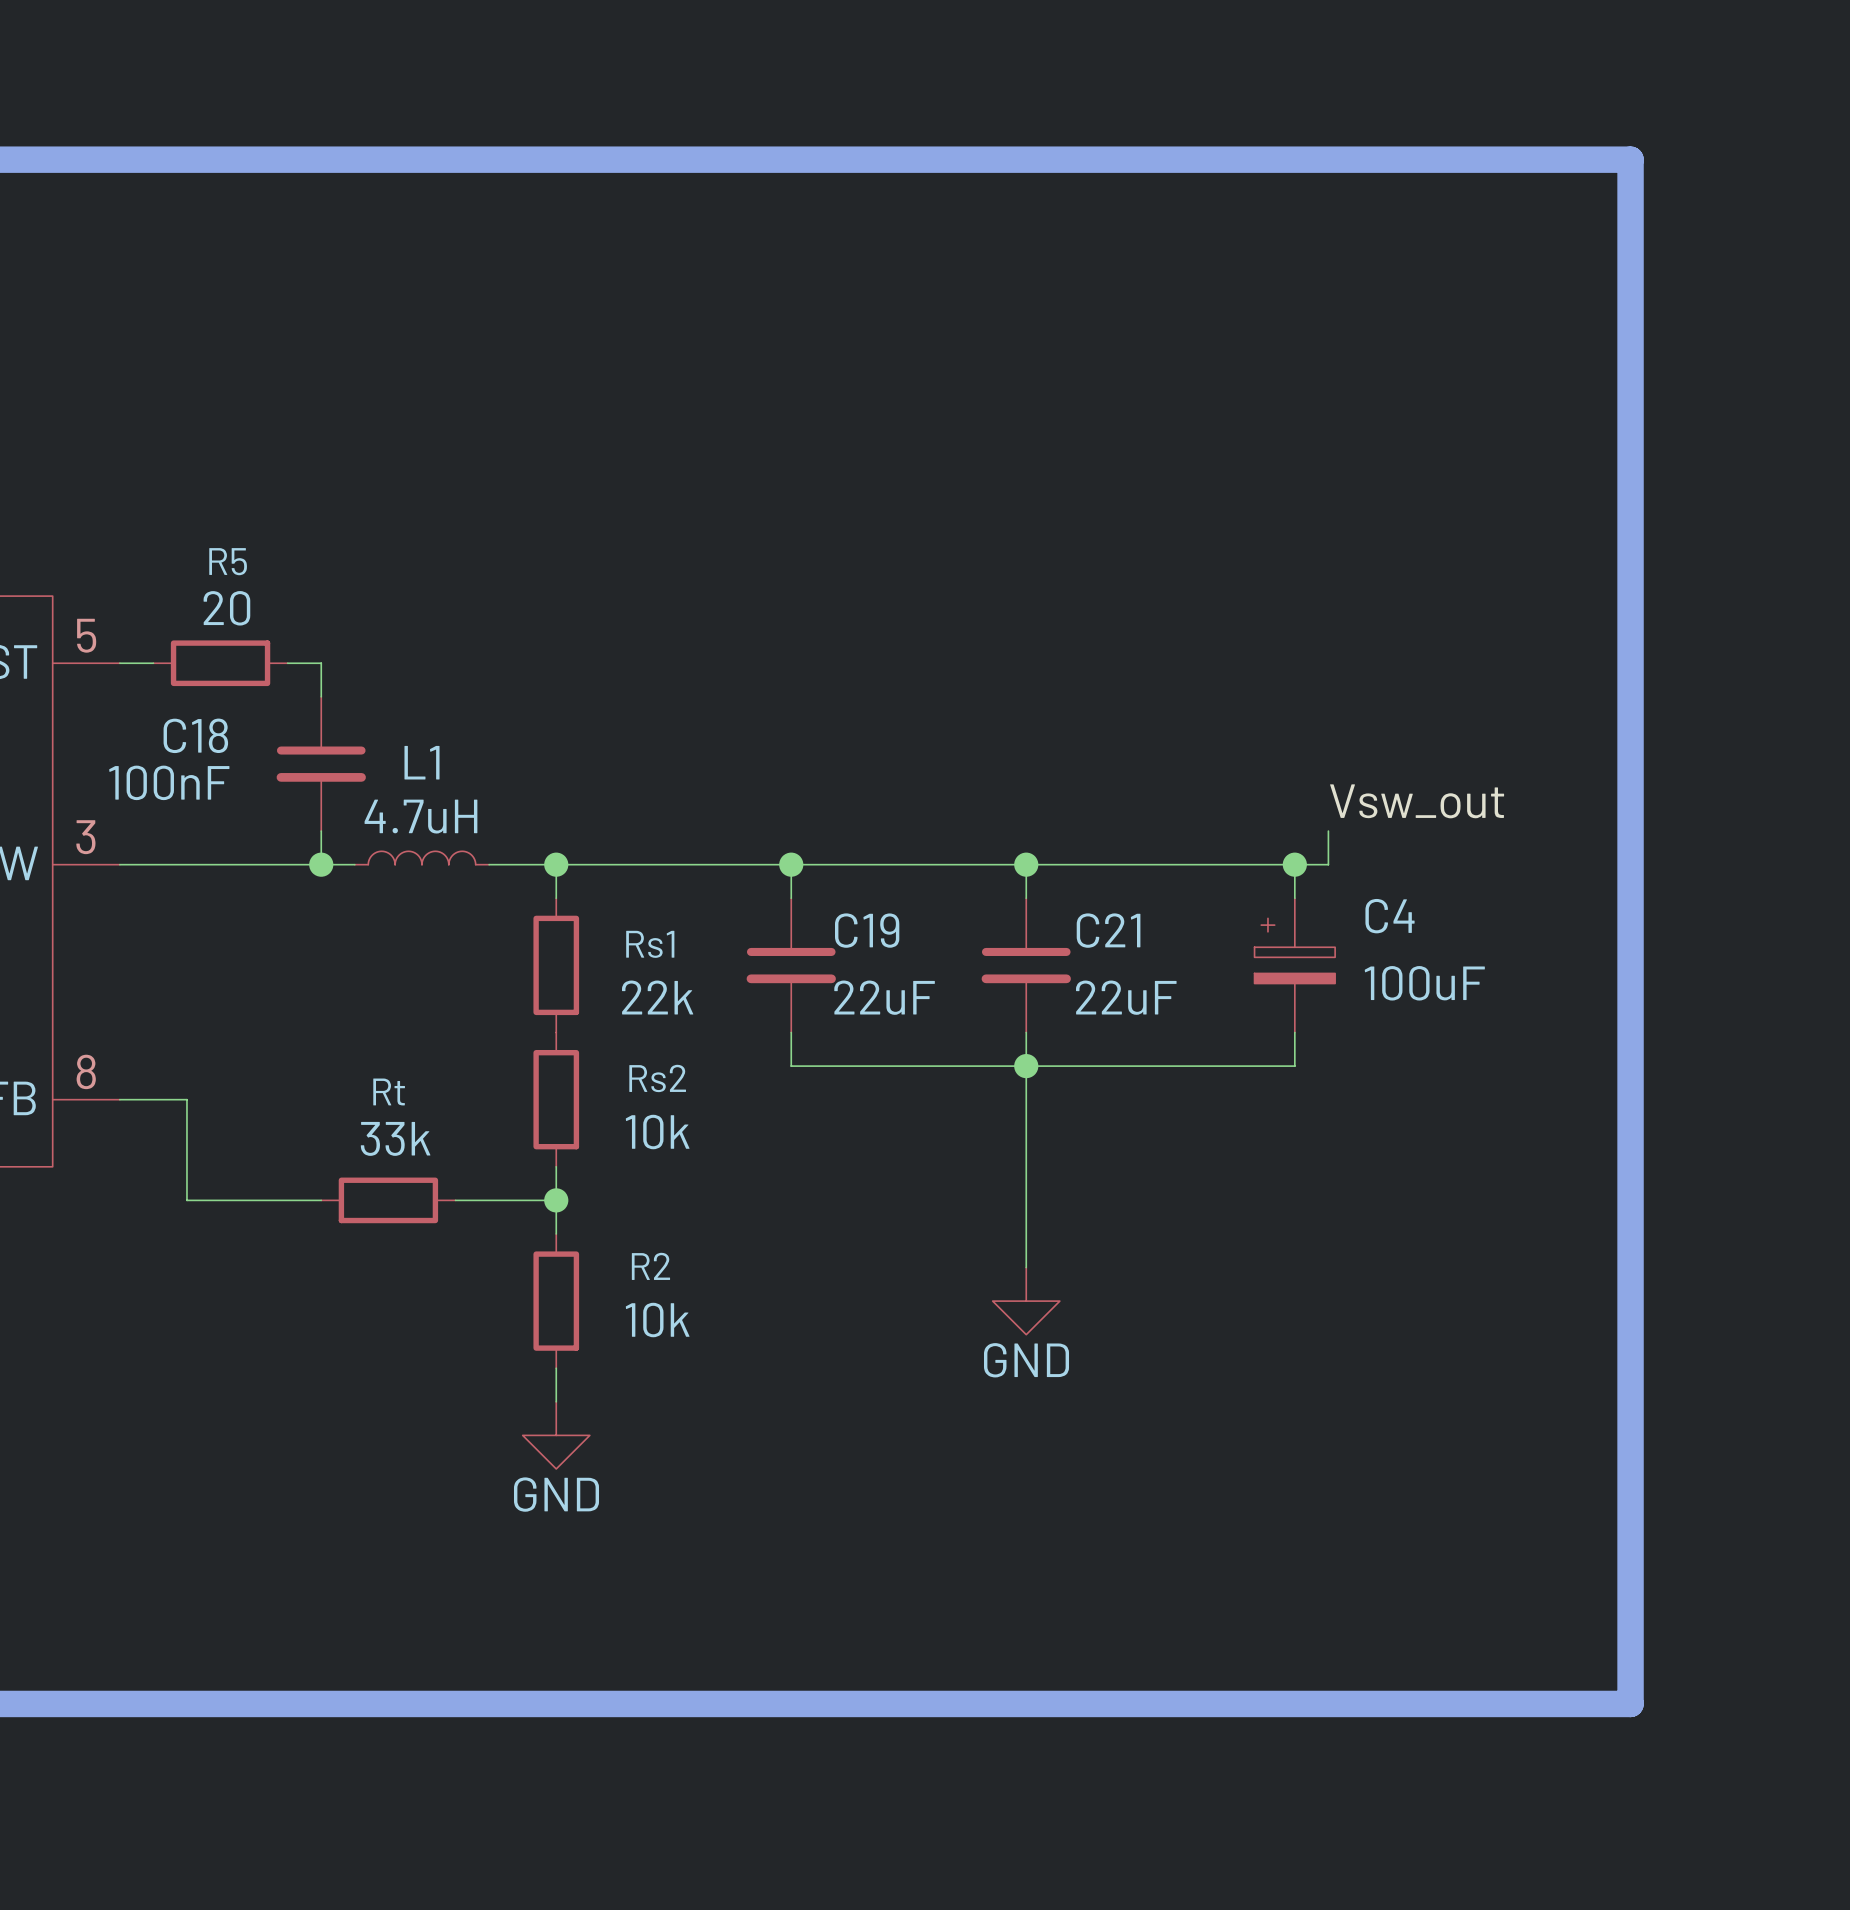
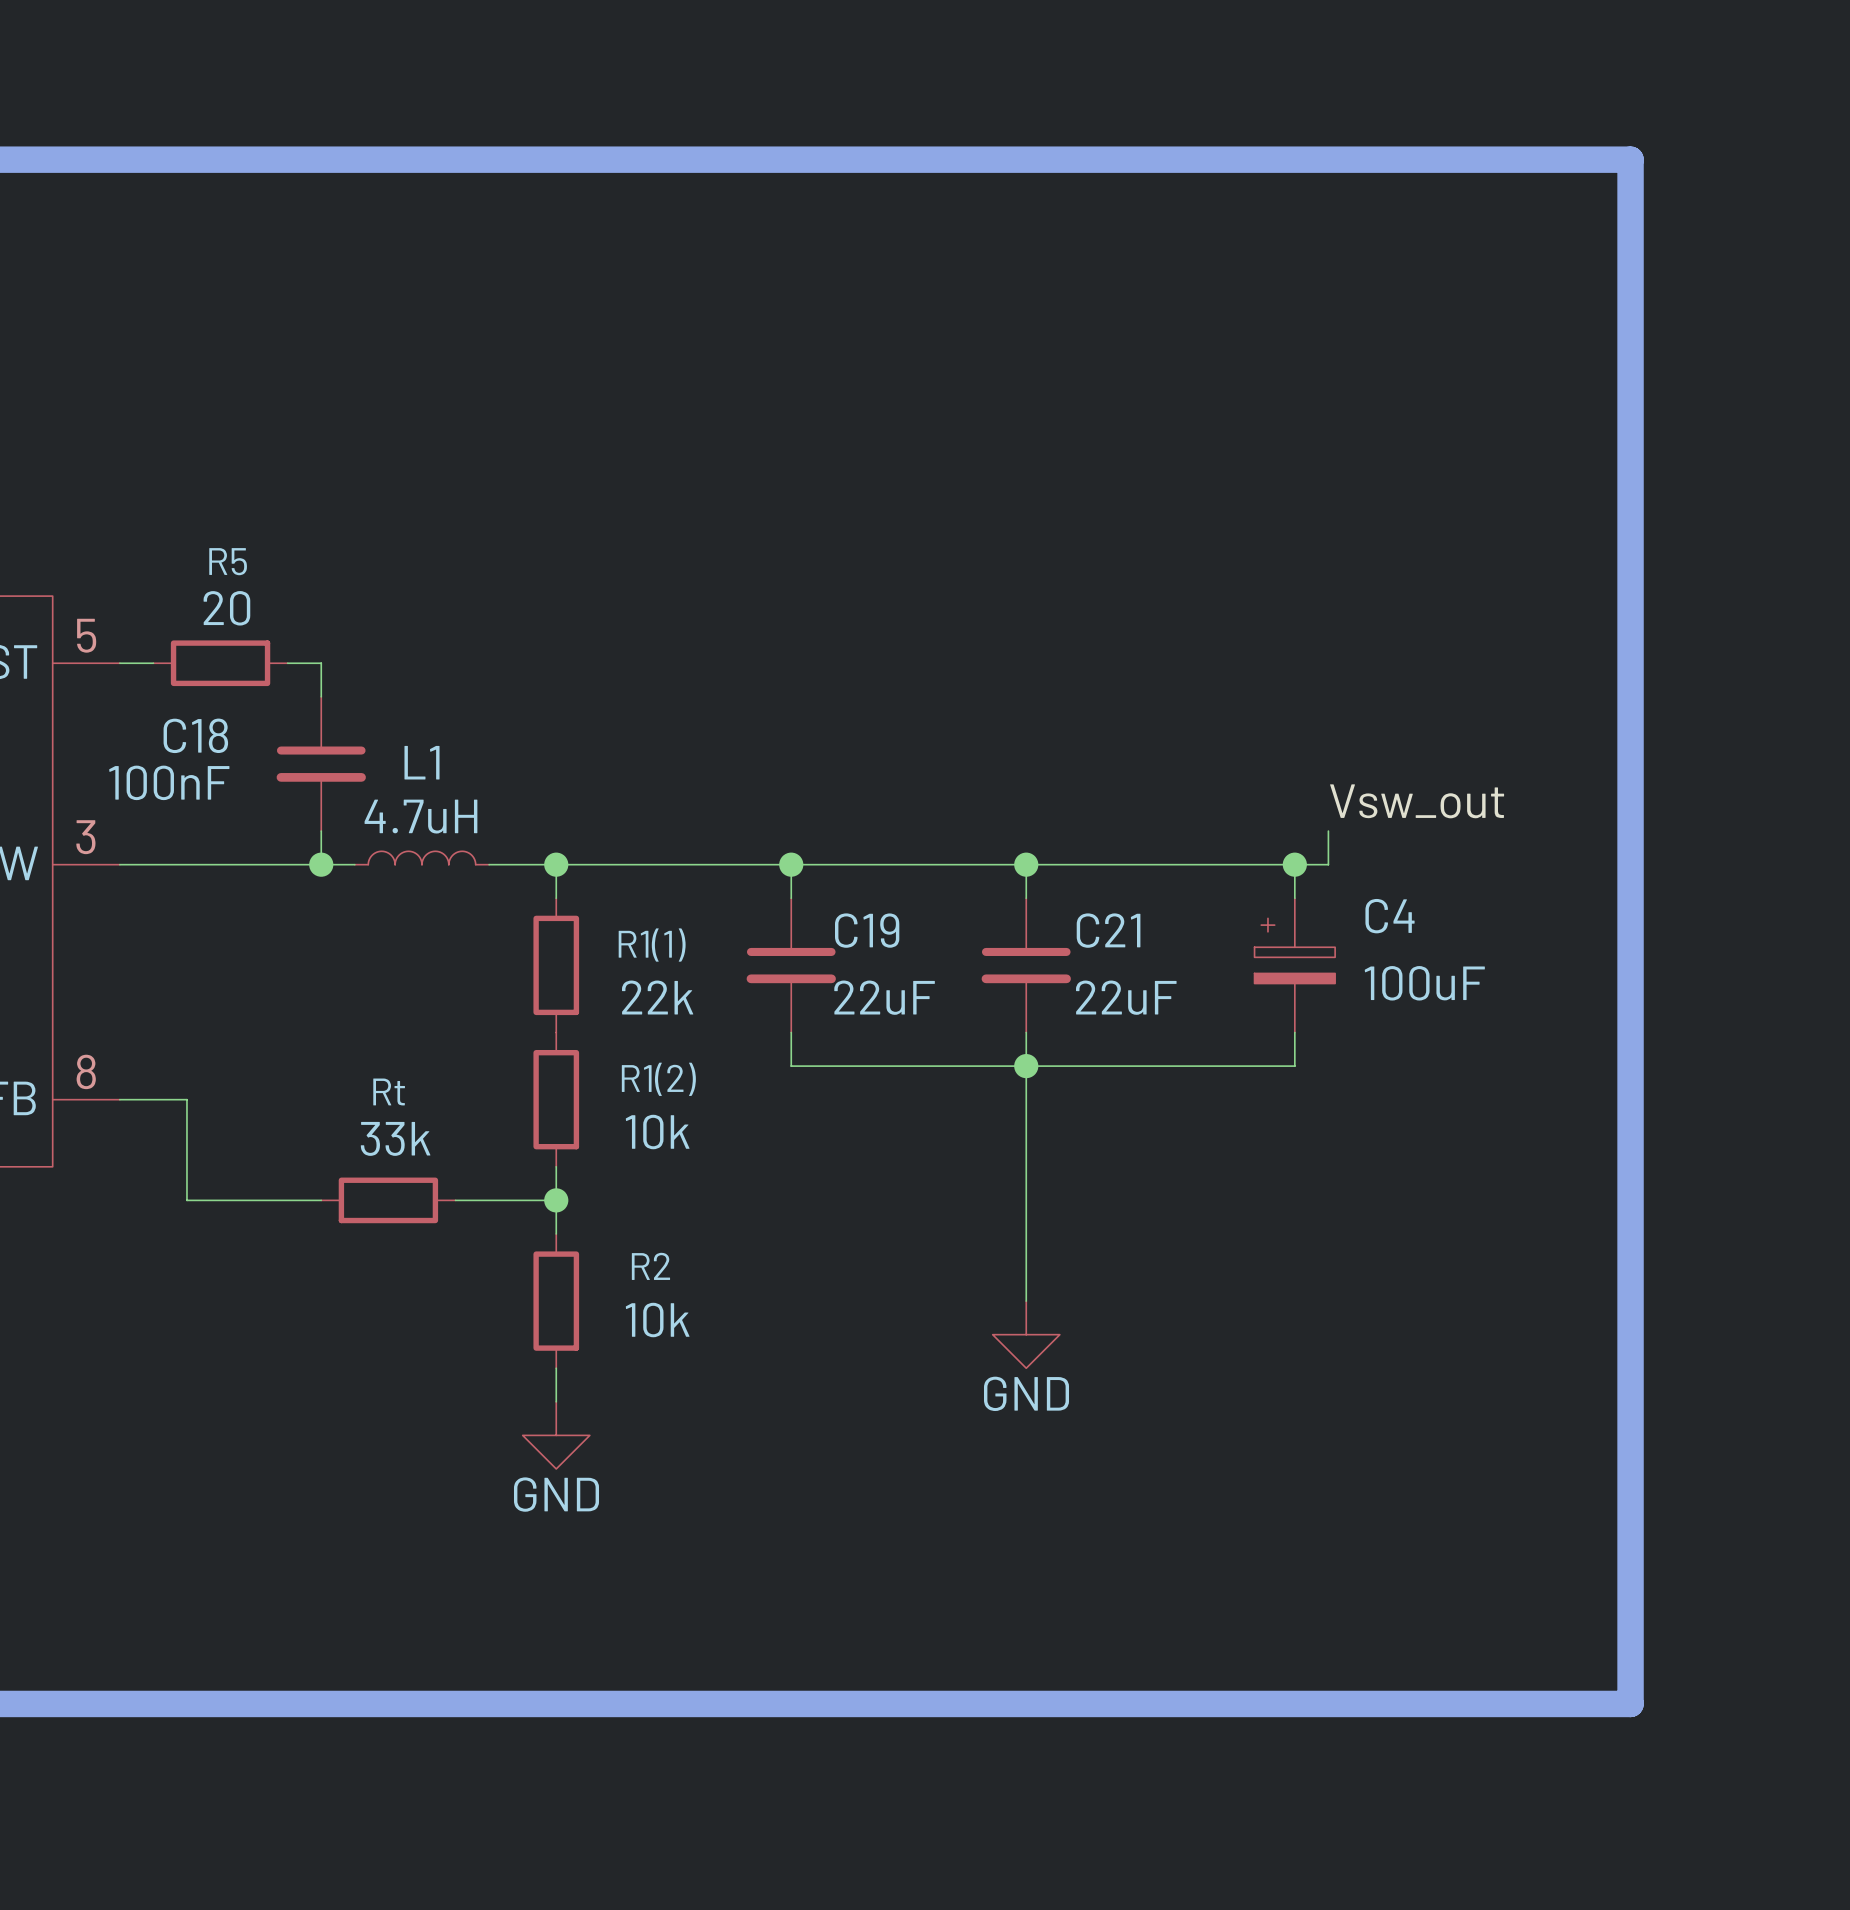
Rs1 name: Rs1 (650, 944) -> R1(1) (652, 945)
Rs2 name: Rs2 (657, 1078) -> R1(2) (658, 1079)
power symbol position: GND (1026, 1301) -> GND (1026, 1334)

